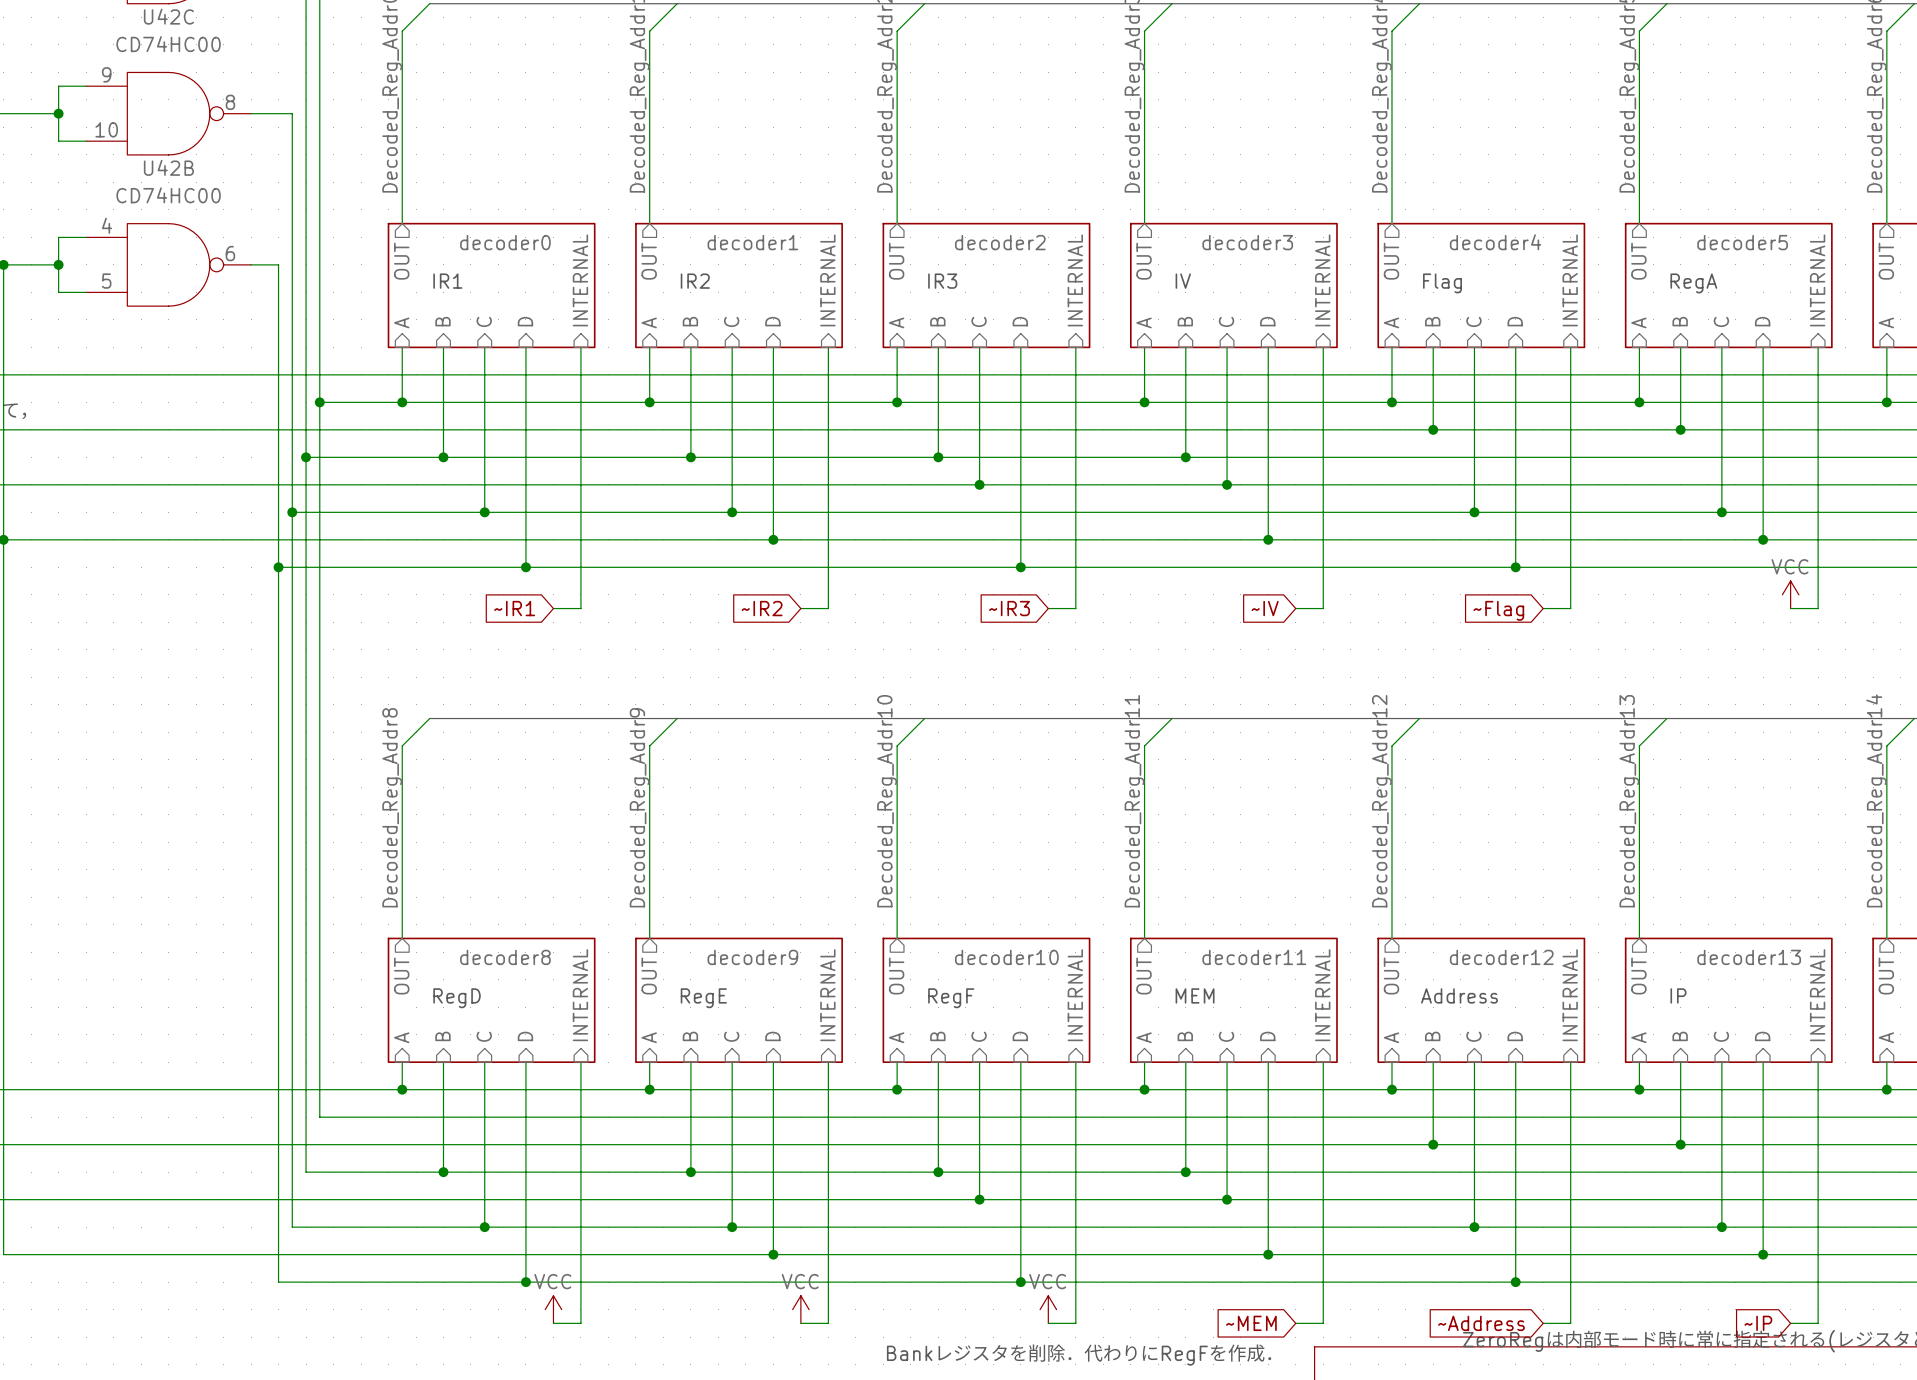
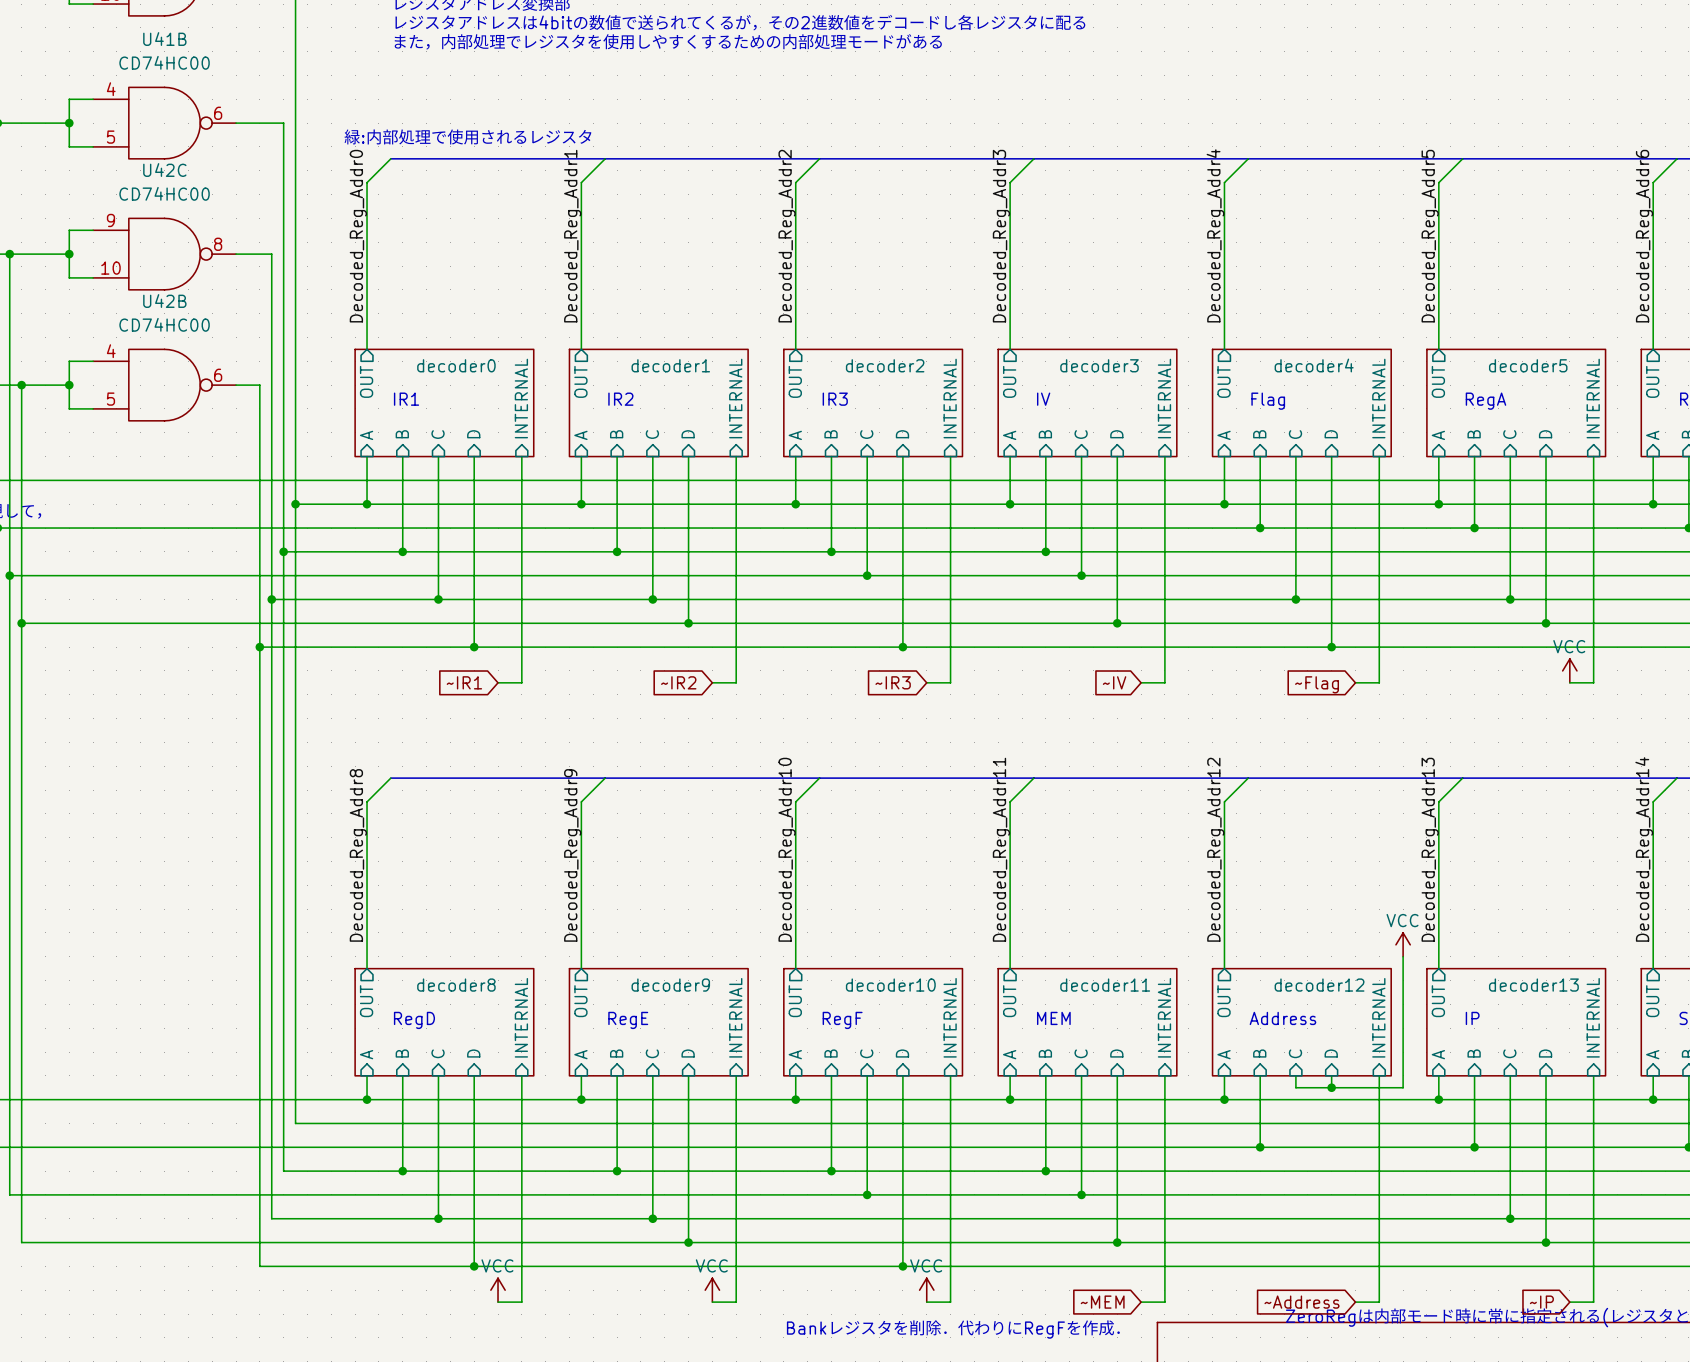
power symbol: none -> VCC (1403, 944)
wire: (1474, 1075) (1474, 1227) -> (1295, 1087) (1403, 1087) (1403, 956)
wire: (1515, 1075) (1515, 1282) -> none
junction: none -> (1331, 1087)
junction: (1474, 1227) -> none
junction: (1515, 1282) -> none

